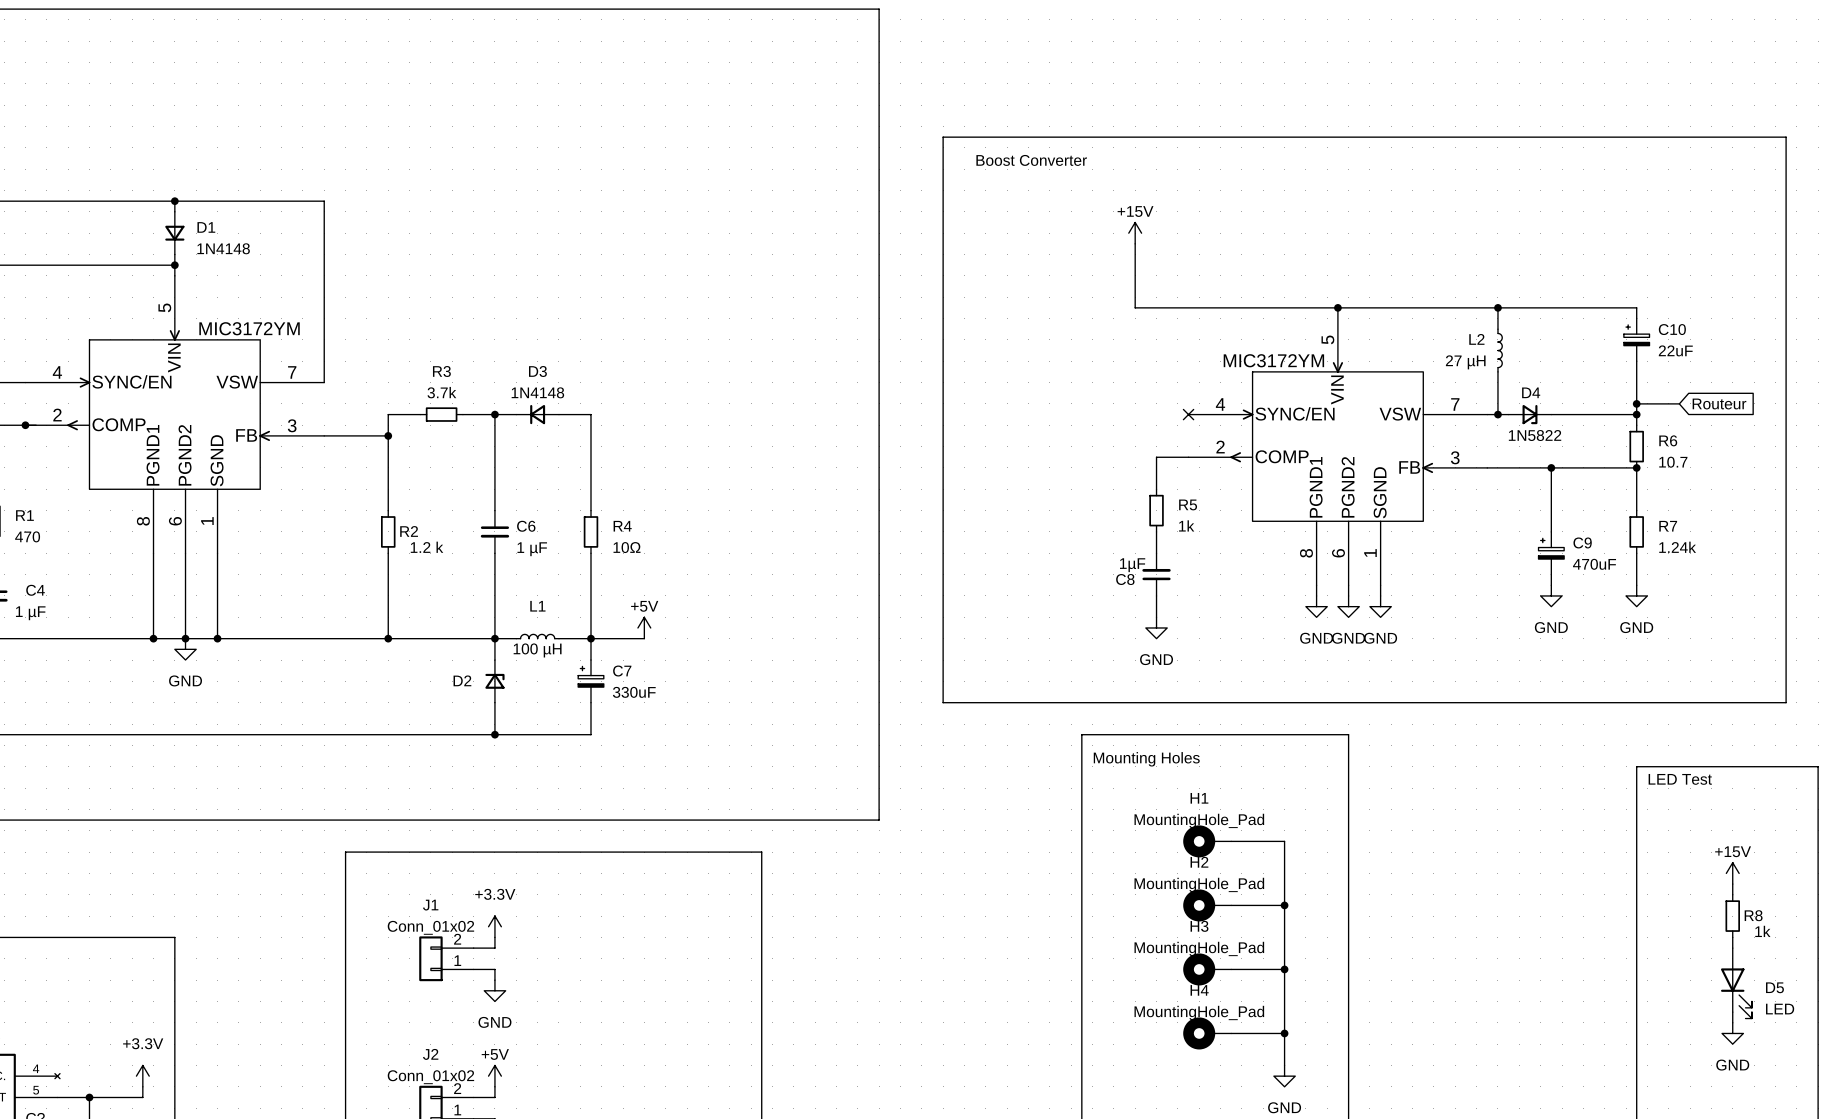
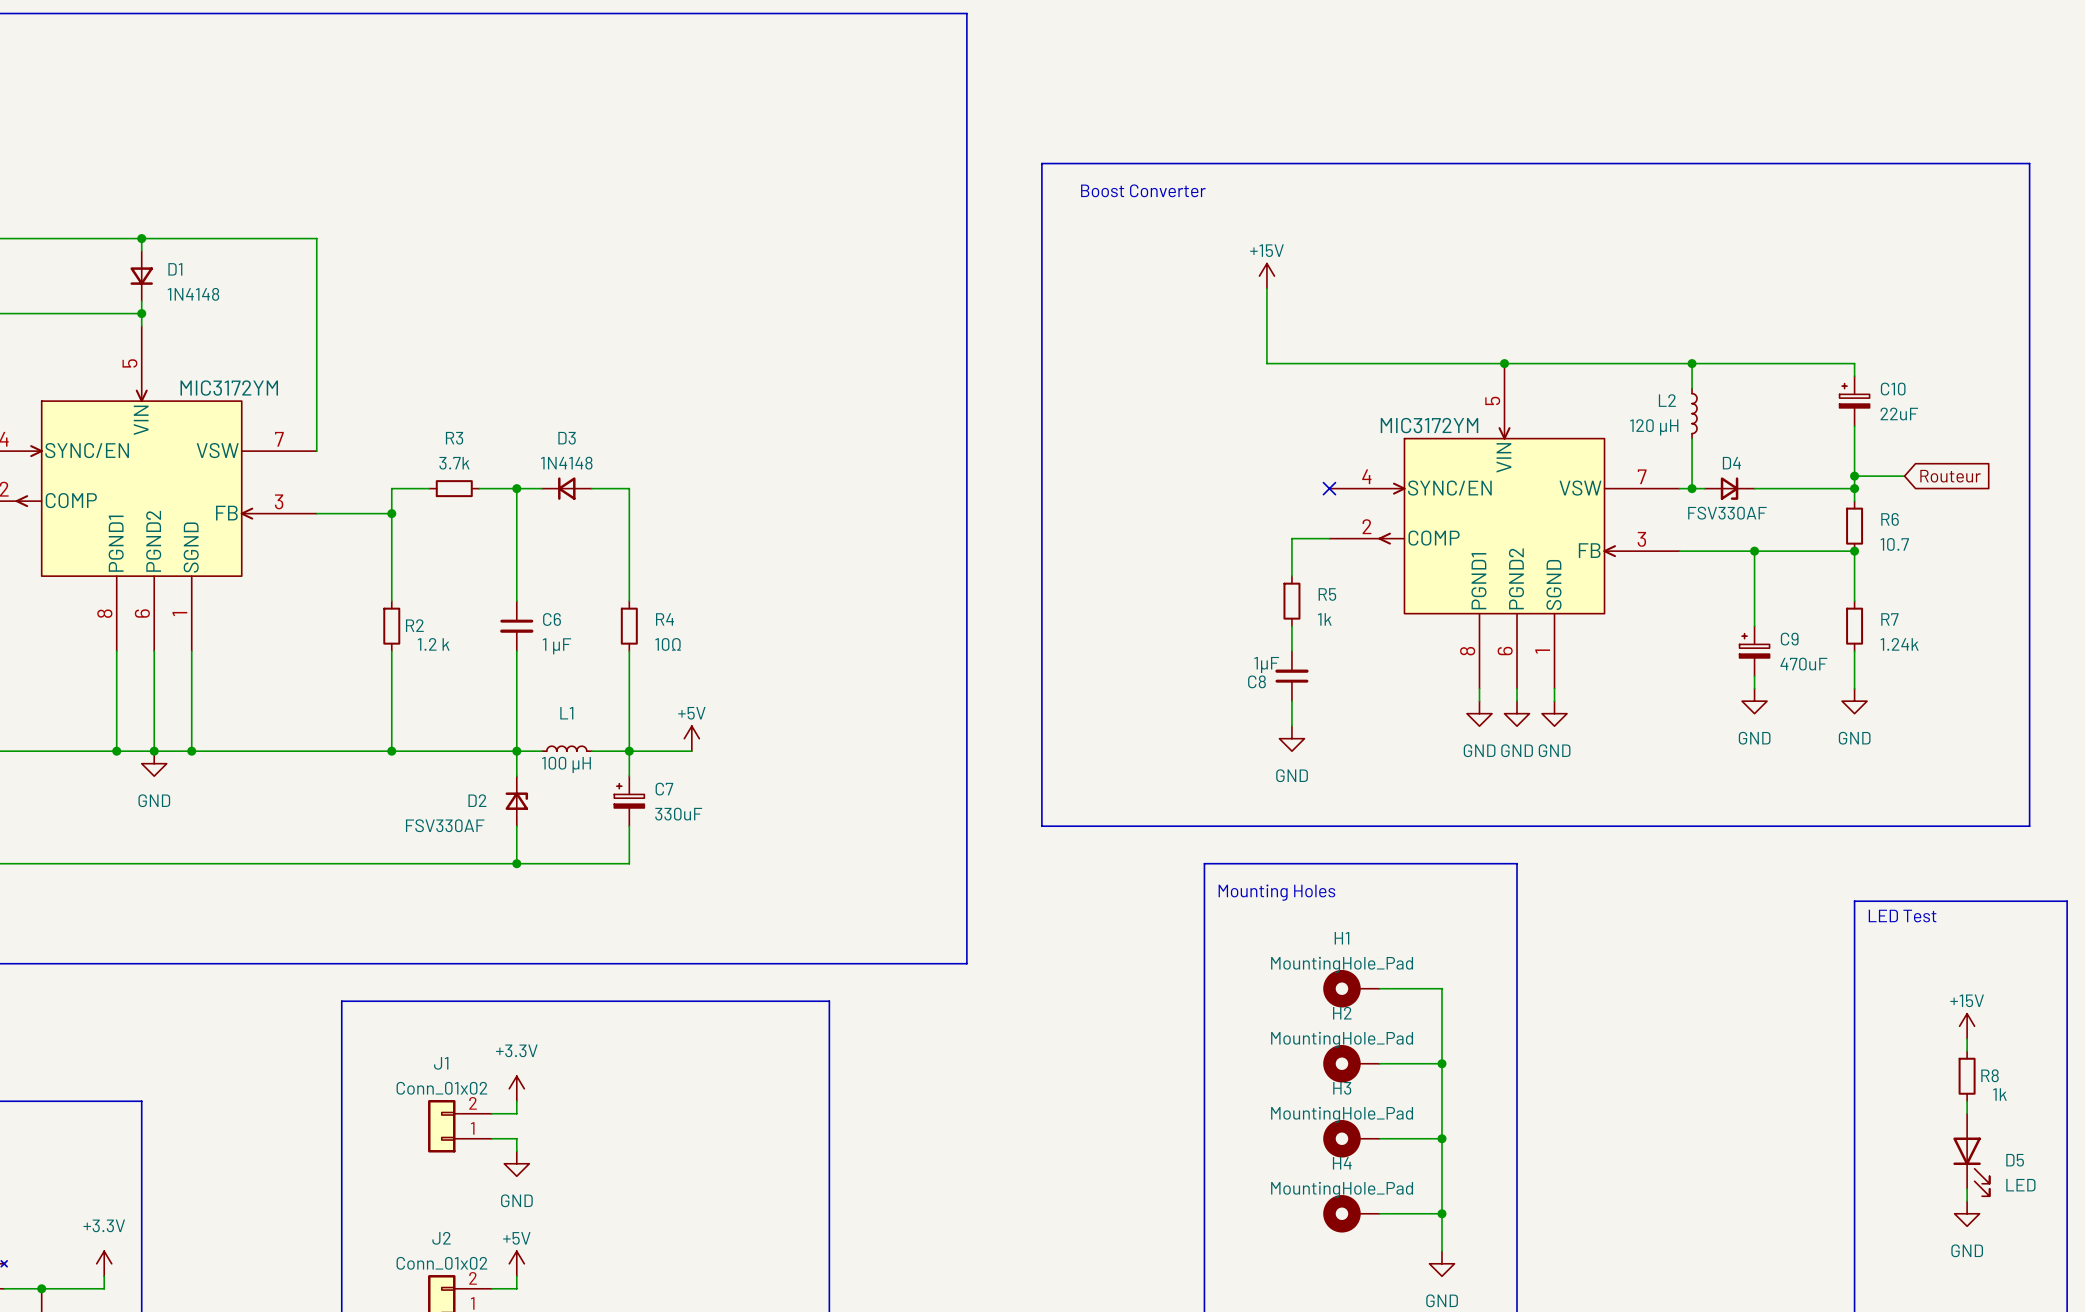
L2 value: 27 µH (1465, 362) -> 120 µH (1654, 427)
D4 value: 1N5822 (1535, 435) -> FSV330AF (1727, 513)
D2 value: none -> FSV330AF (445, 825)

